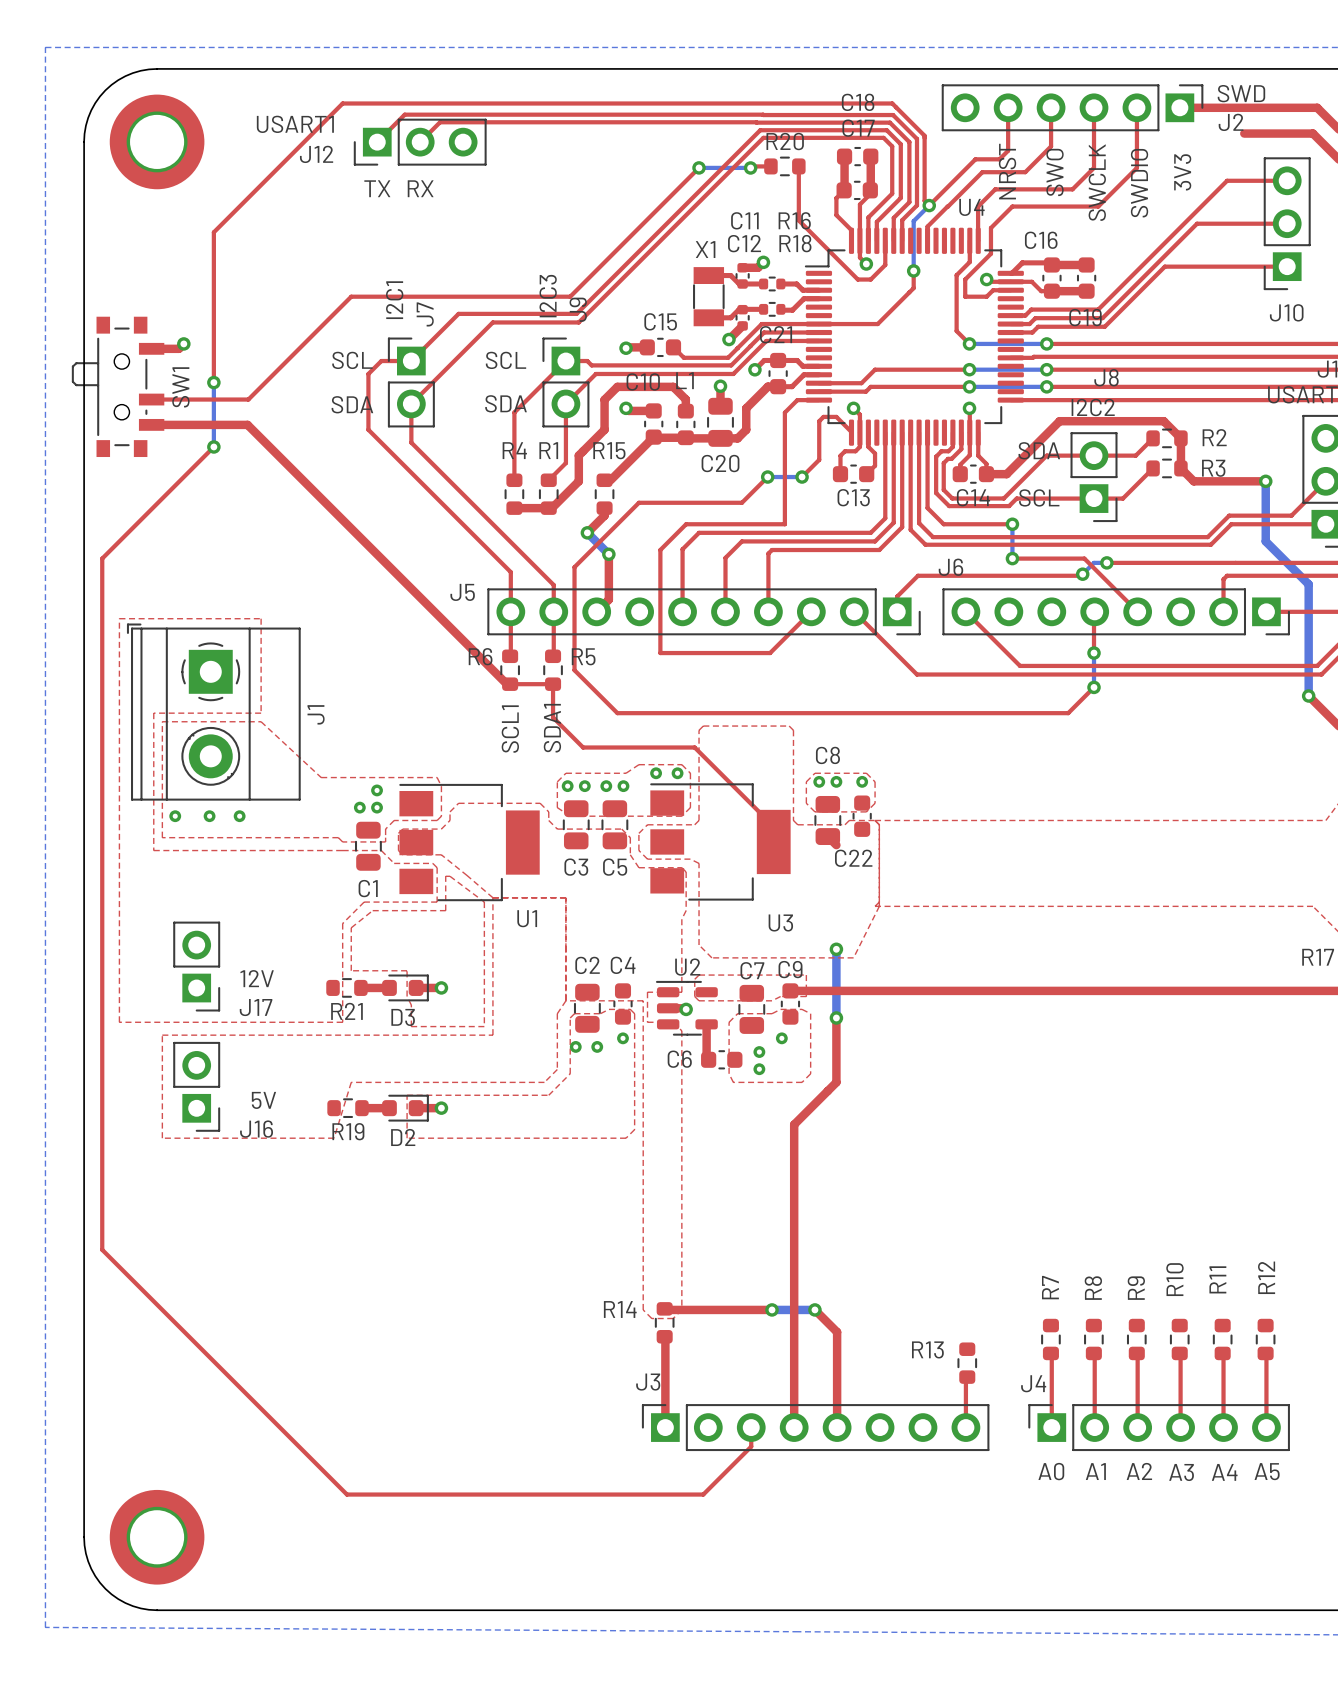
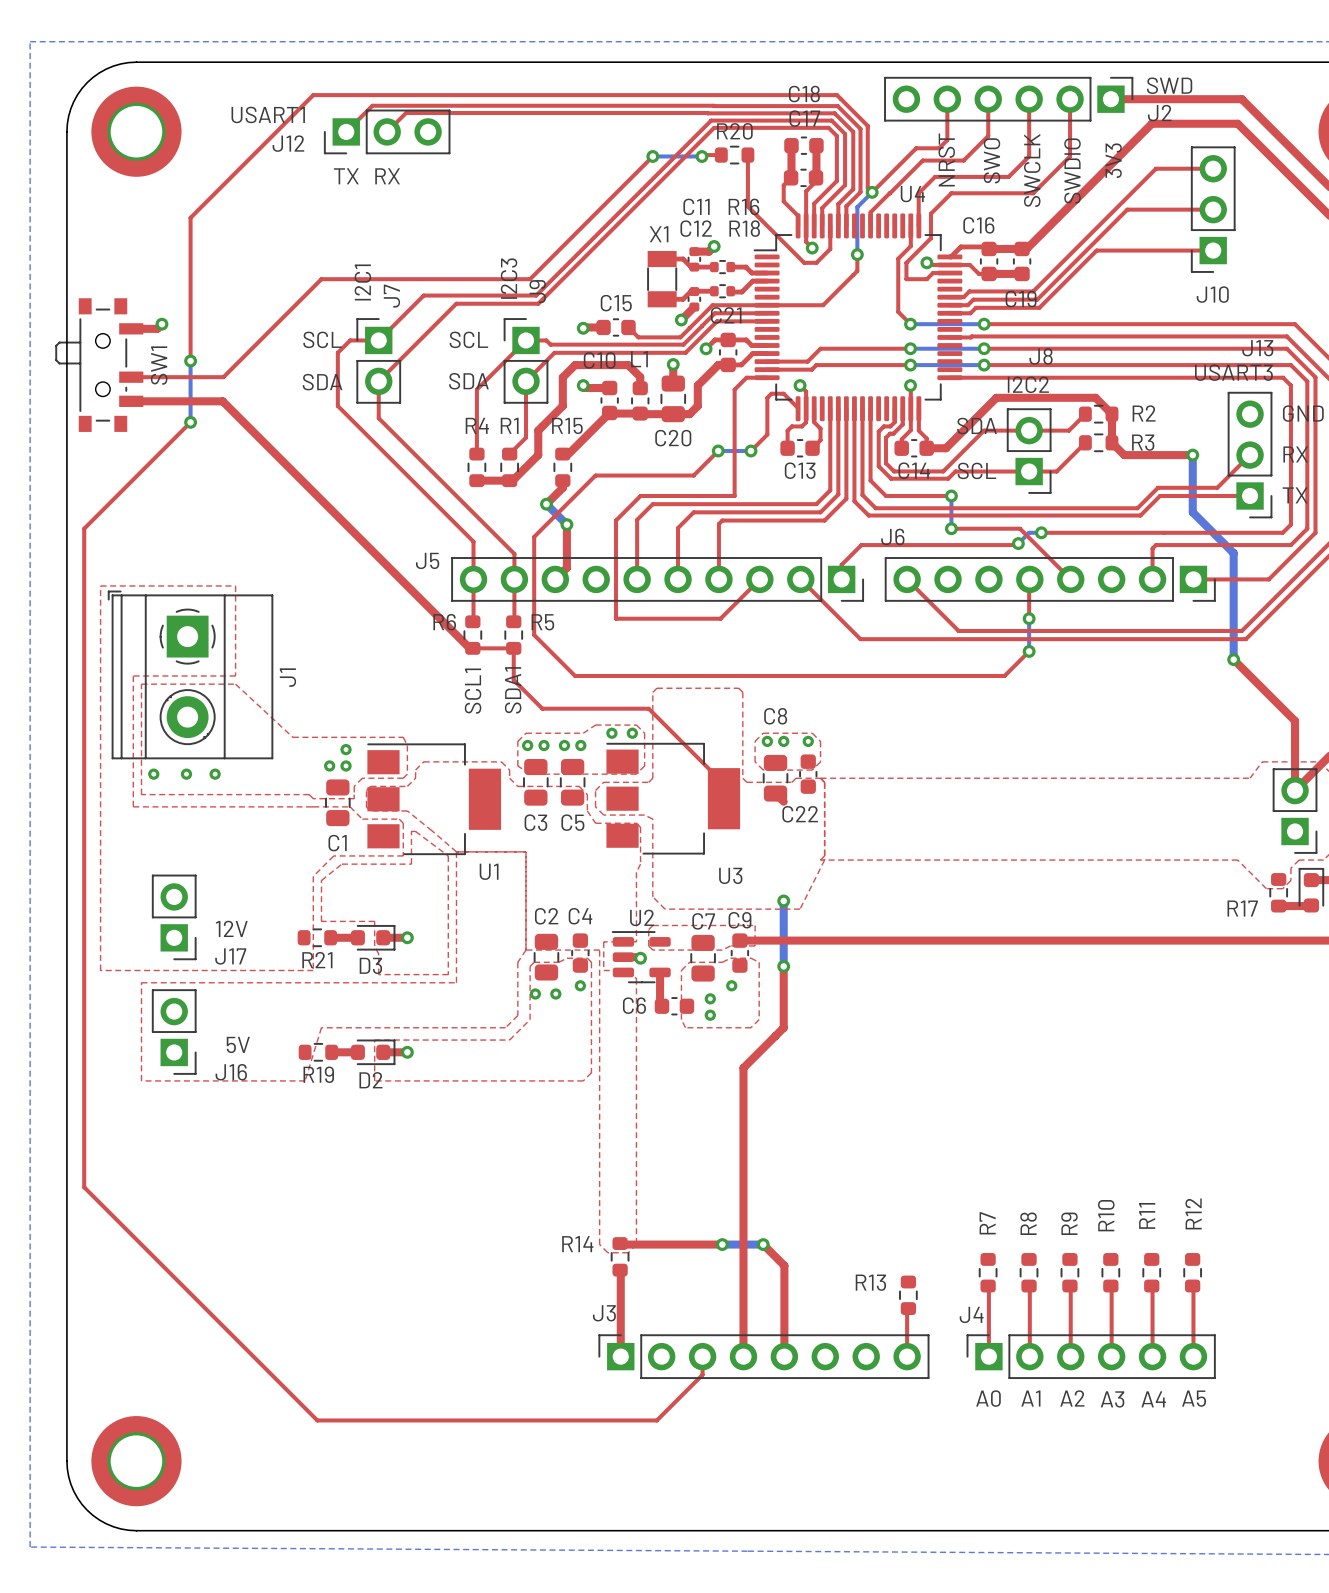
top track: none -> (1172, 123) (1151, 123) (1026, 248) (1022, 248)

